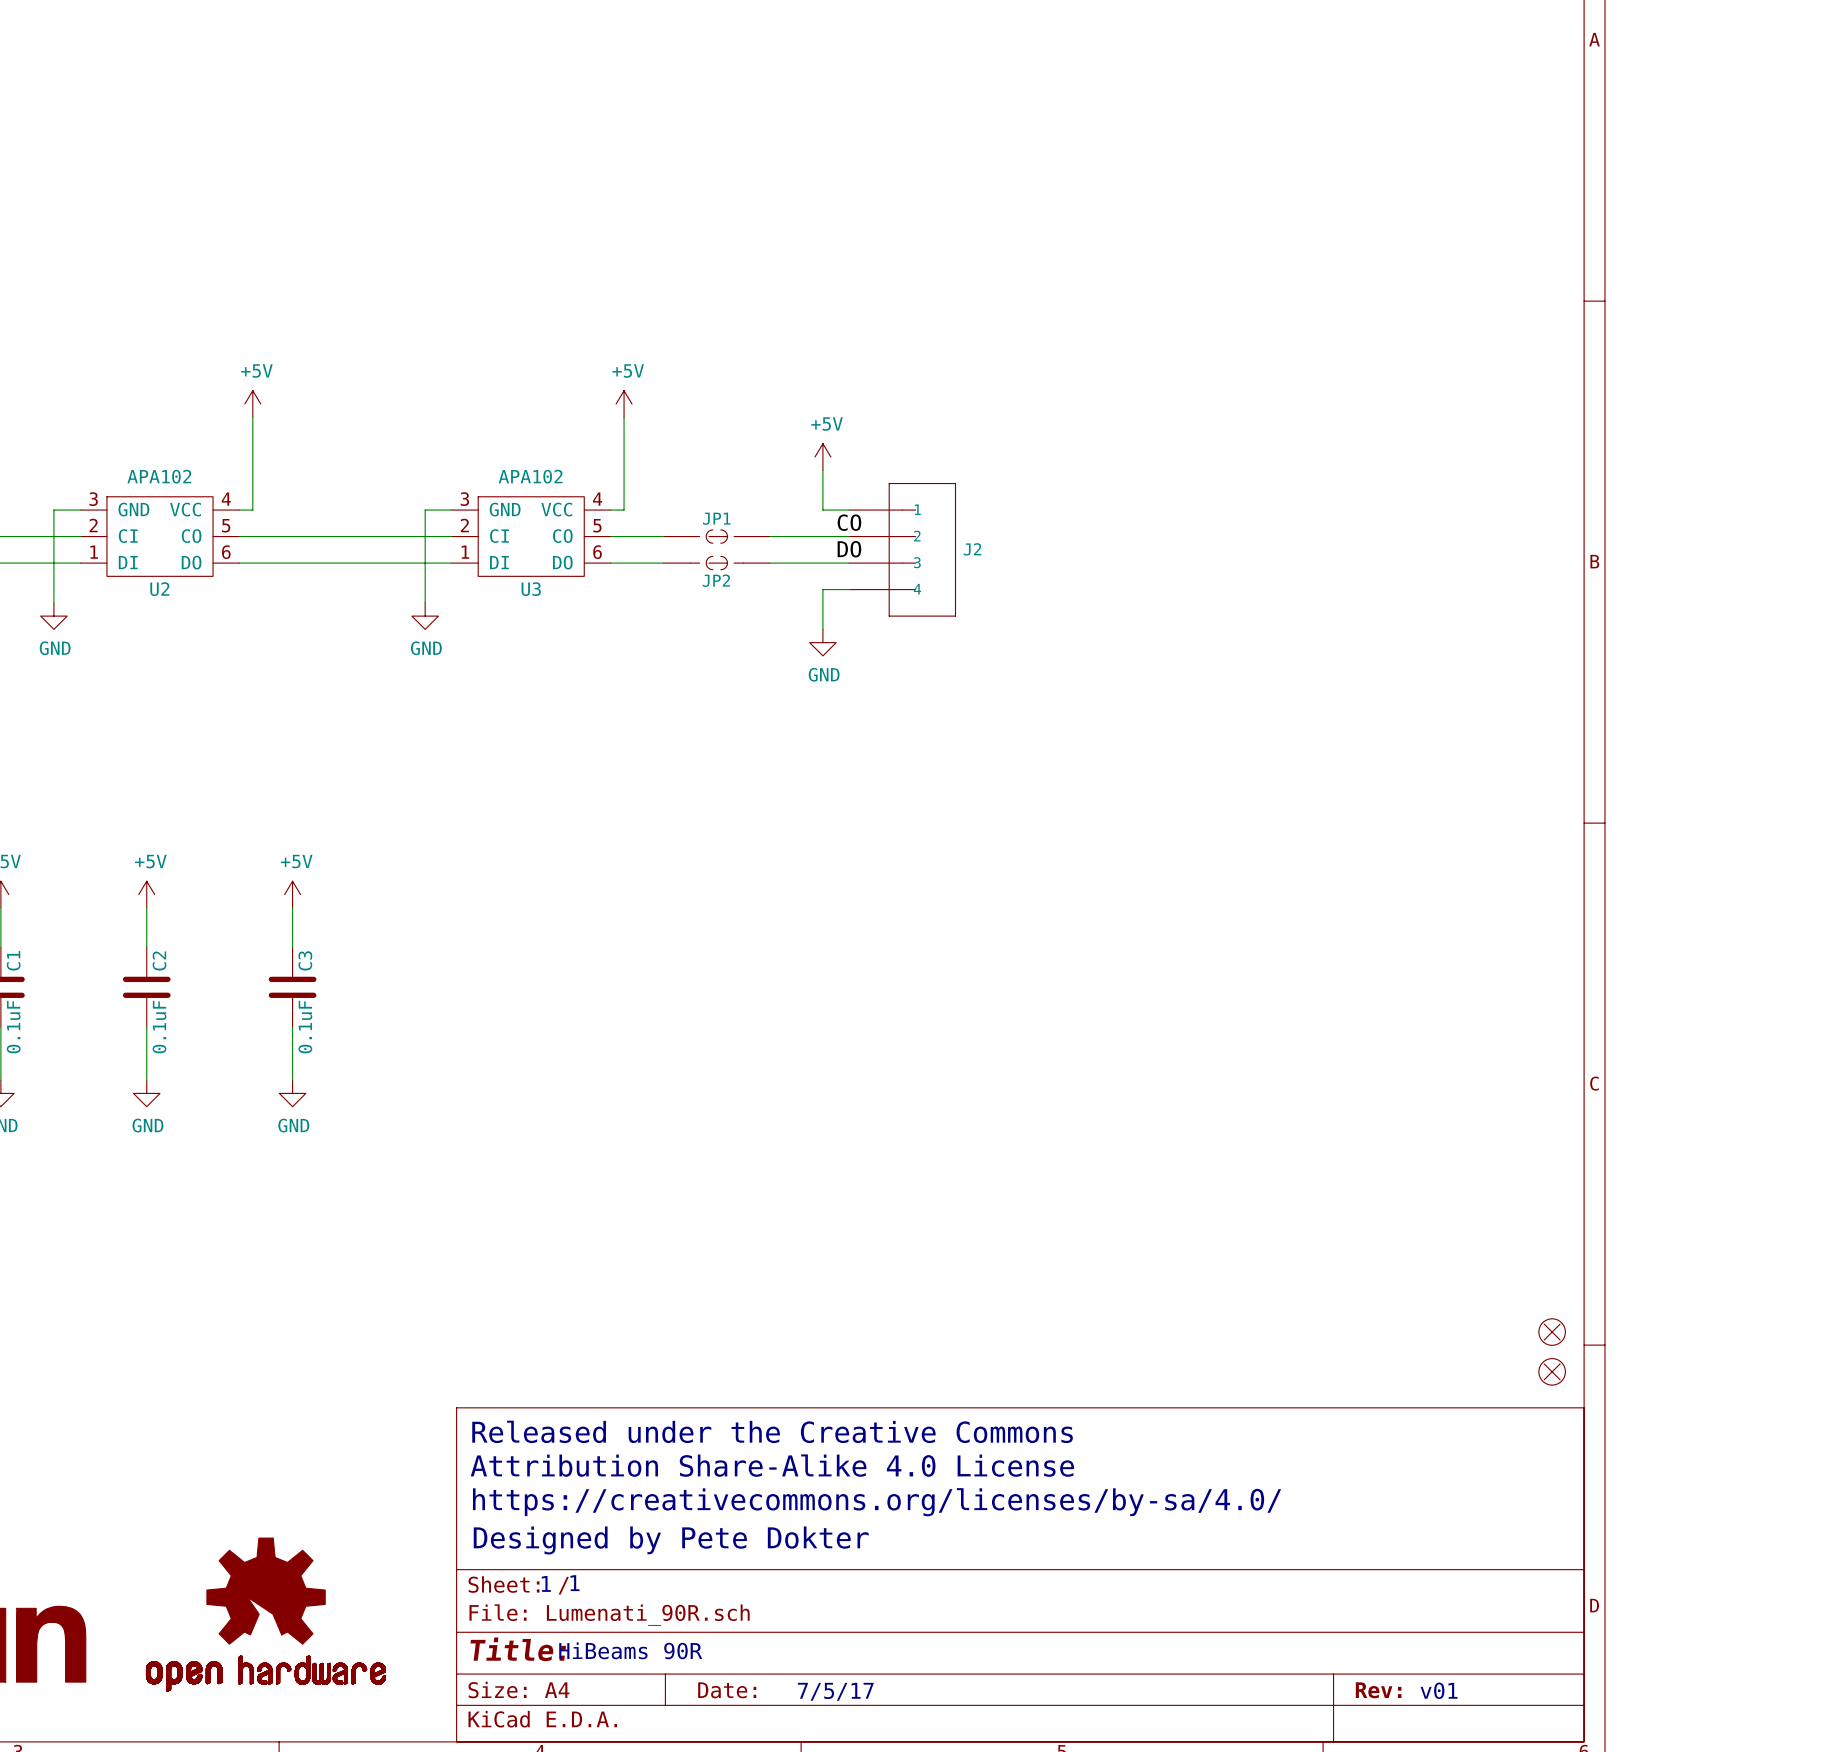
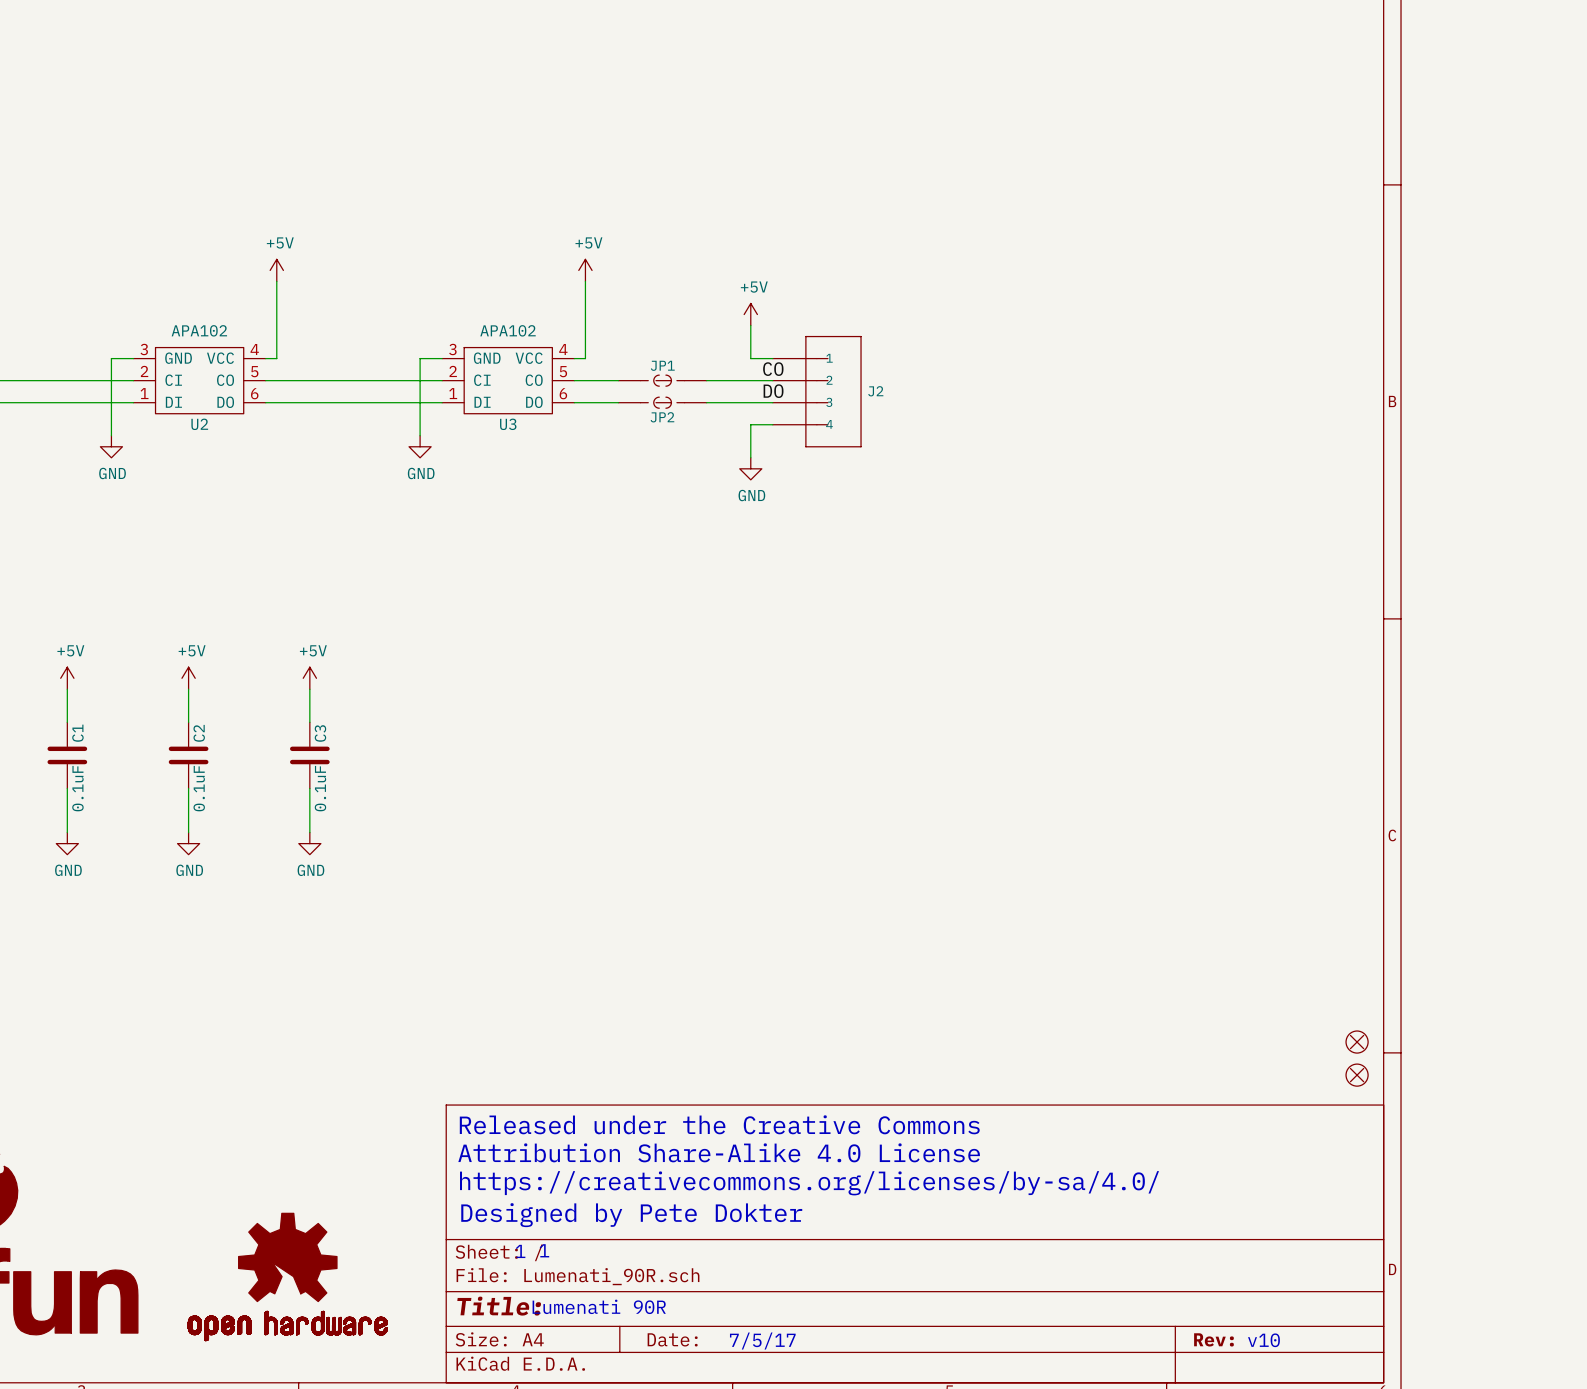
text: HiBeams 90R (630, 1650) -> Lumenati 90R (599, 1306)
text: v01 (1439, 1690) -> v10 (1263, 1340)

